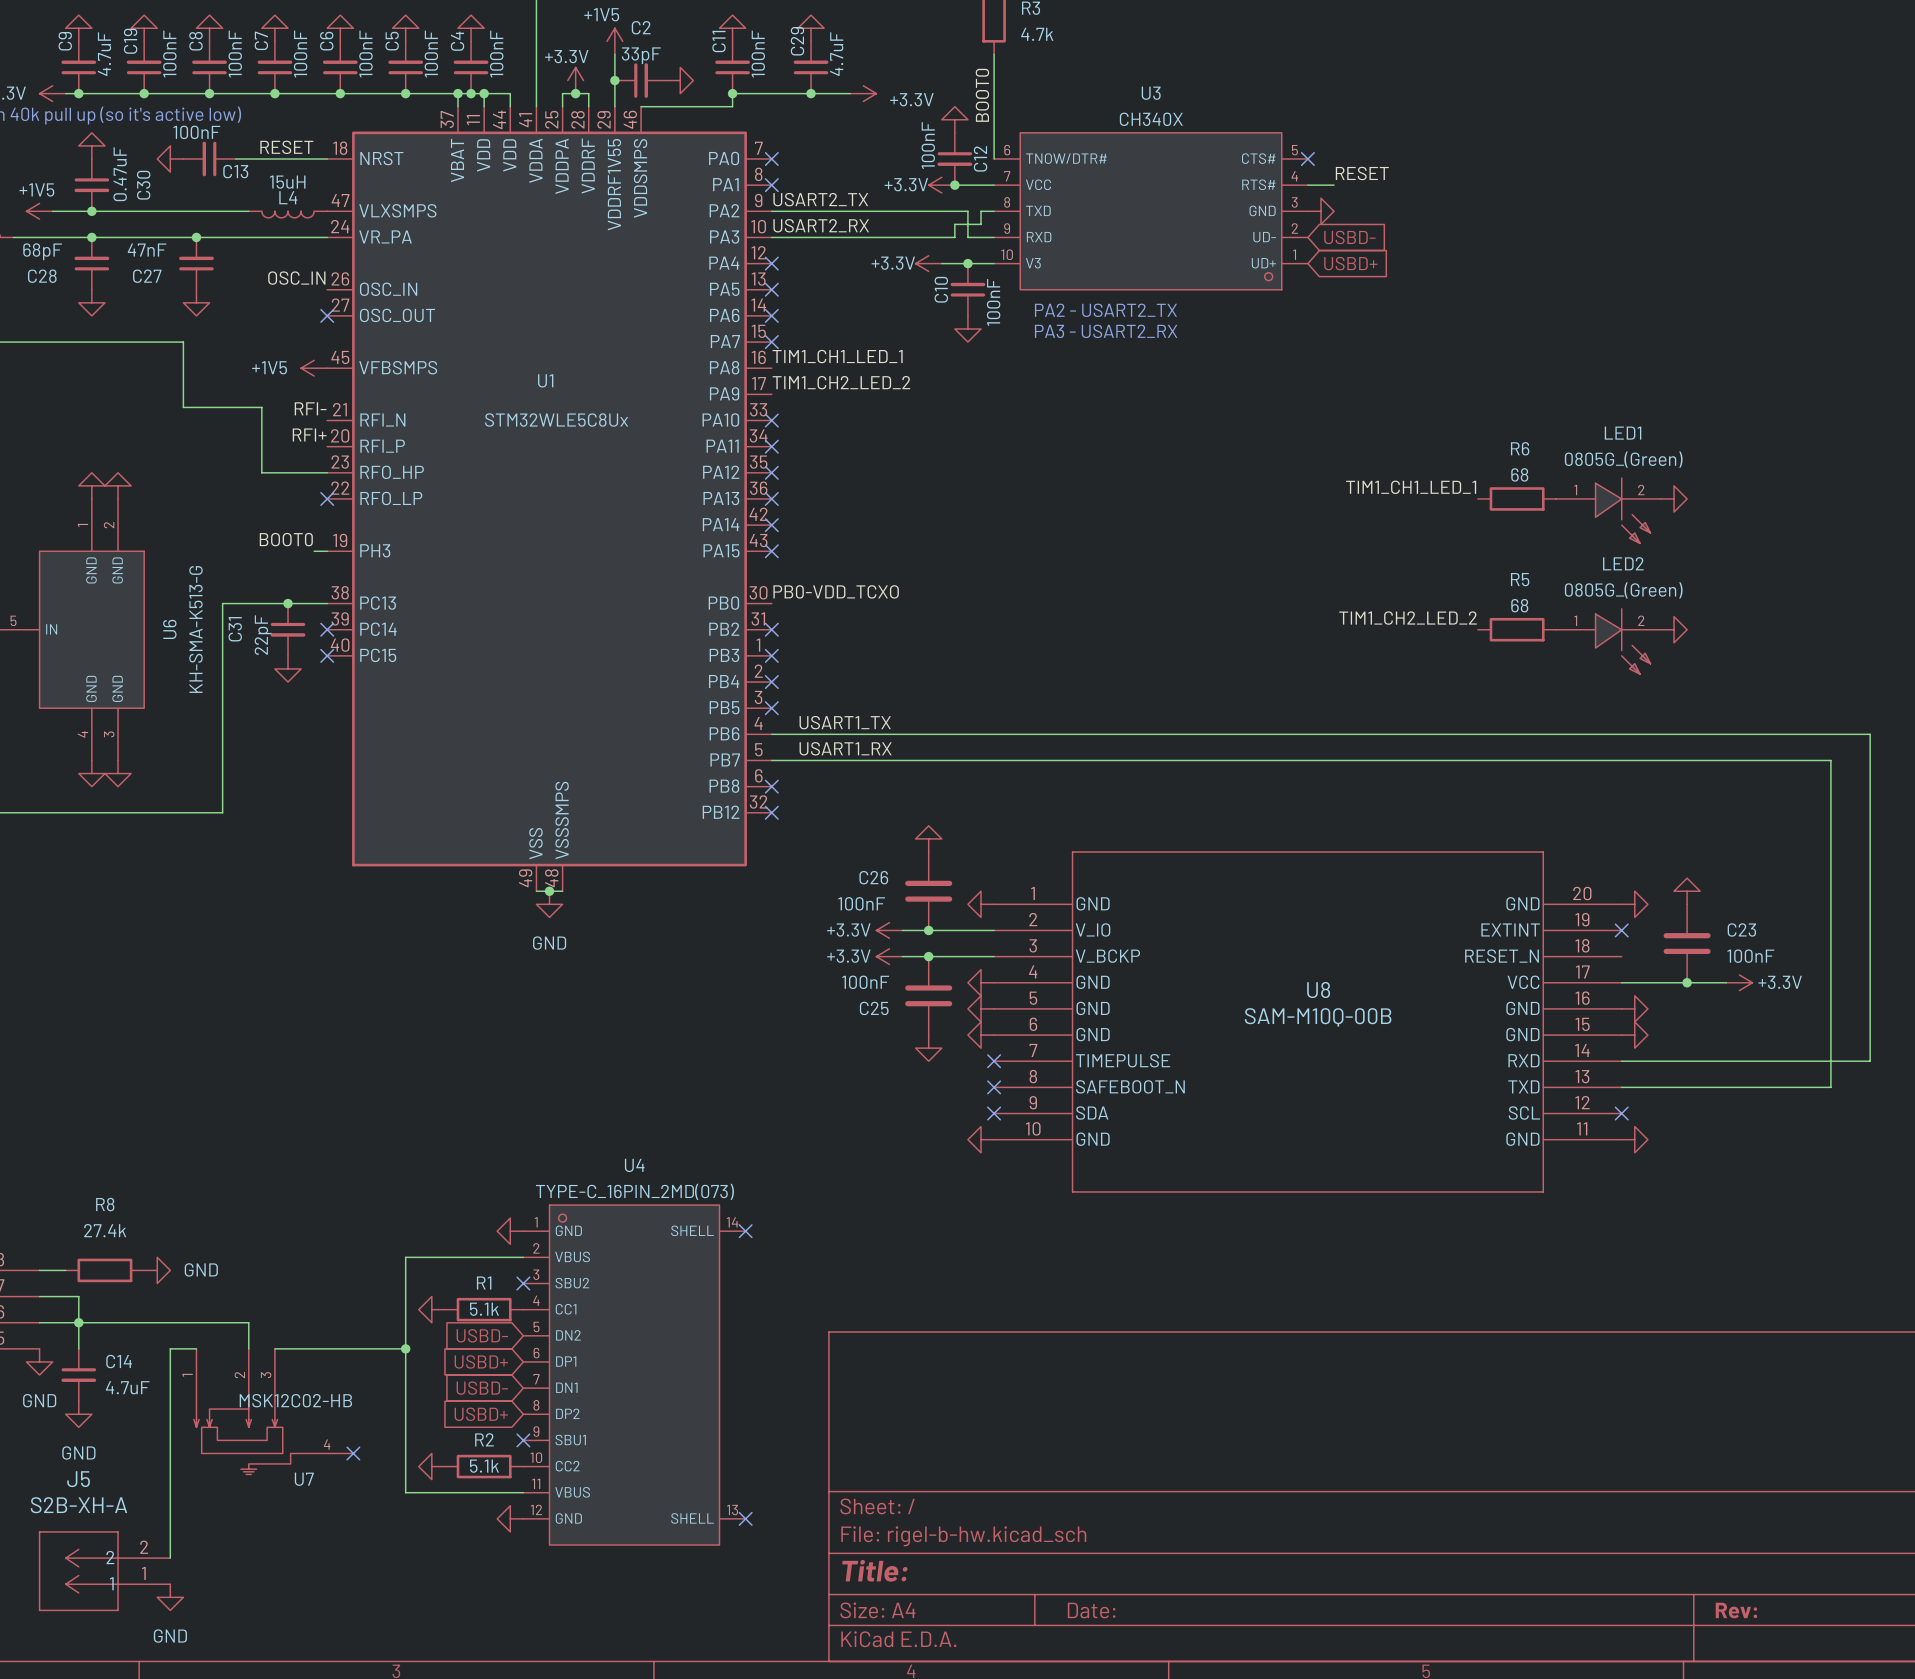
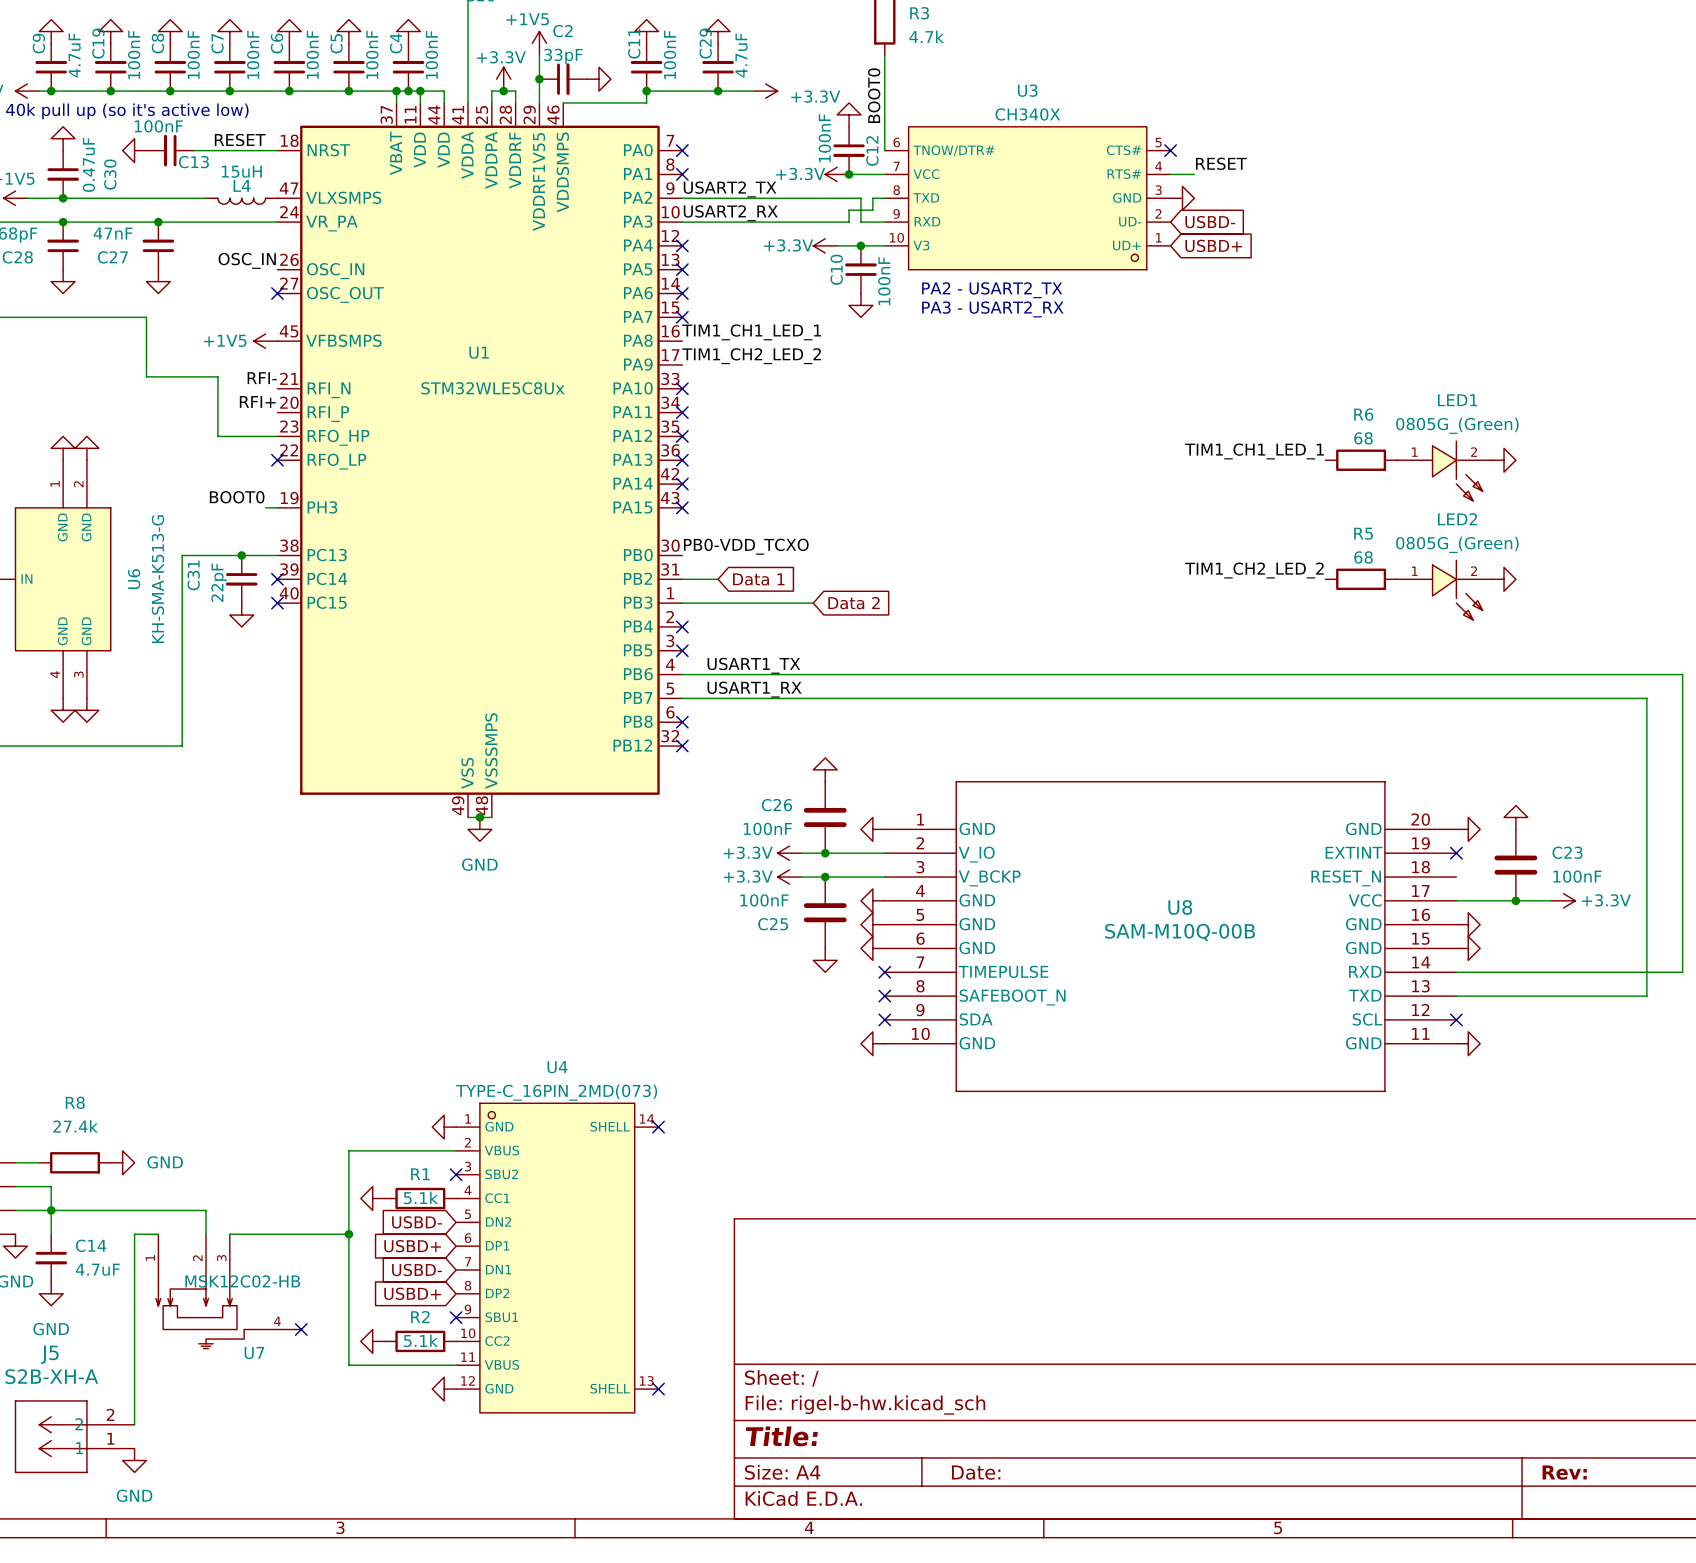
wire: none -> (682, 579) (718, 579)
no-connect mark: (771, 629) -> none
global label: none -> Data 1 (758, 579)
wire: none -> (682, 603) (813, 603)
no-connect mark: (771, 655) -> none
global label: none -> Data 2 (854, 603)

